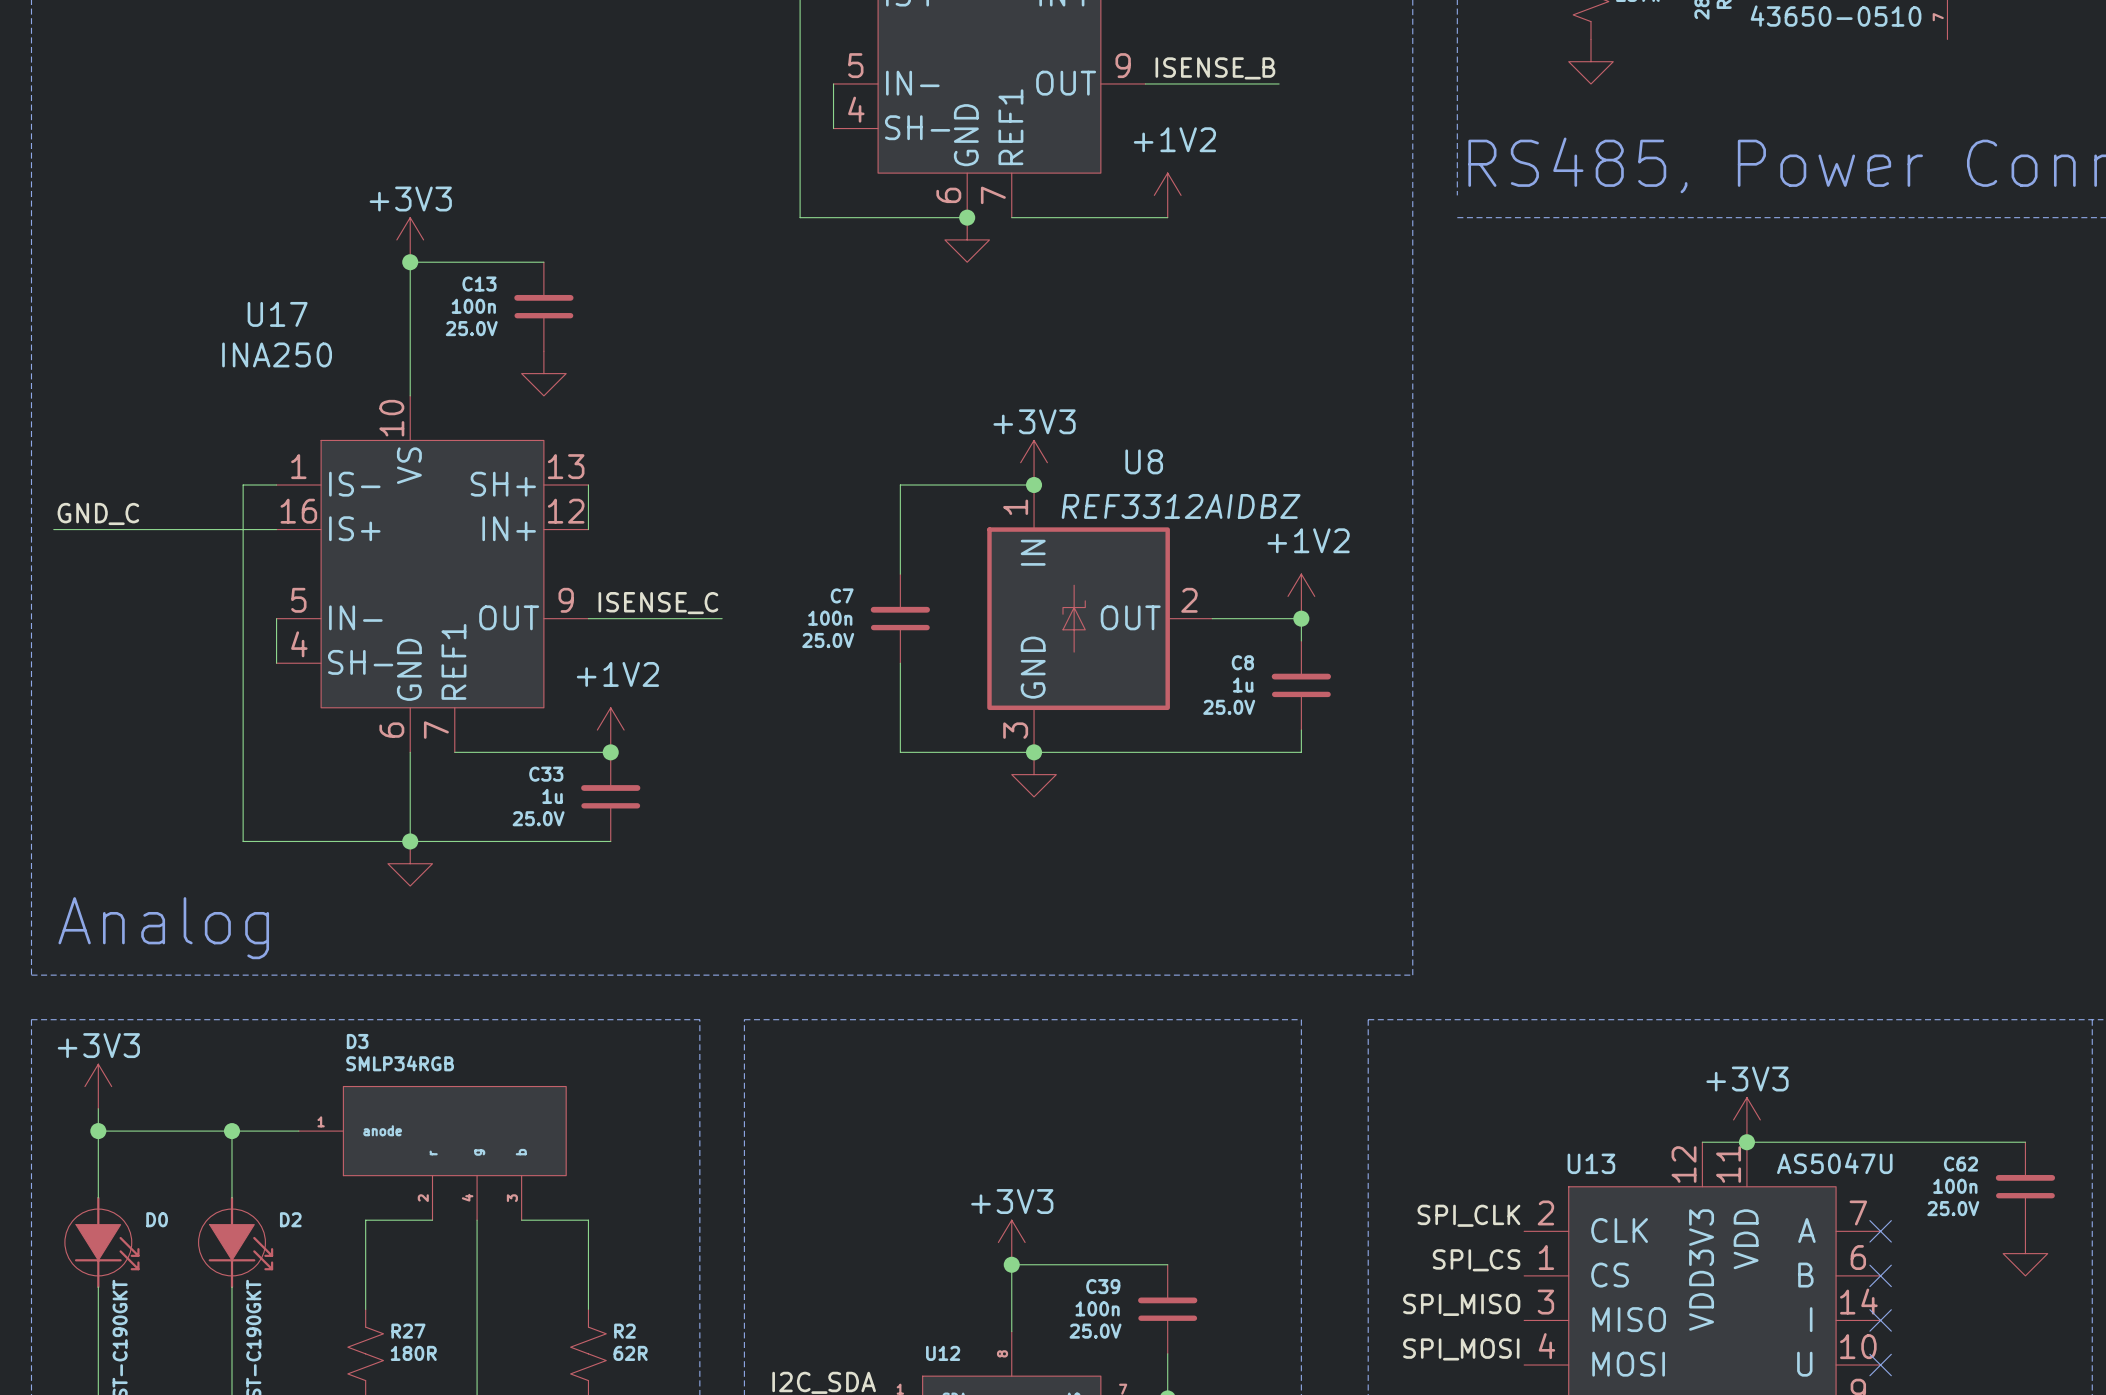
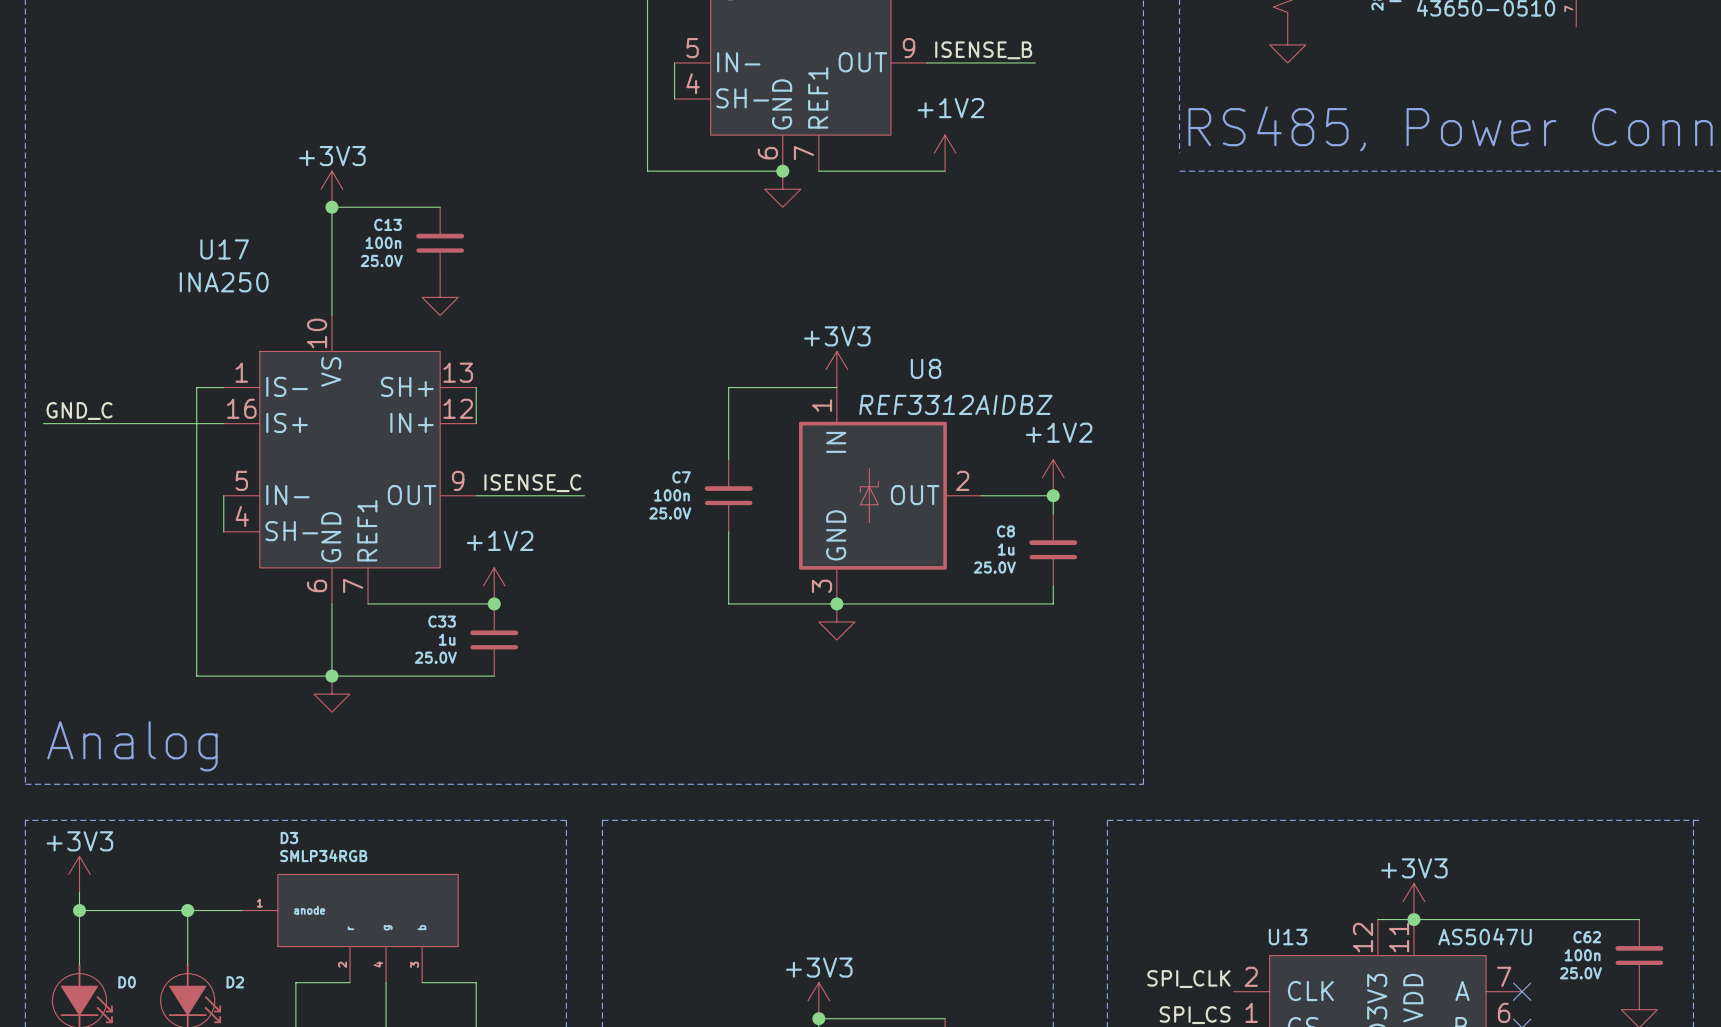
junction: (1034, 485) -> none

